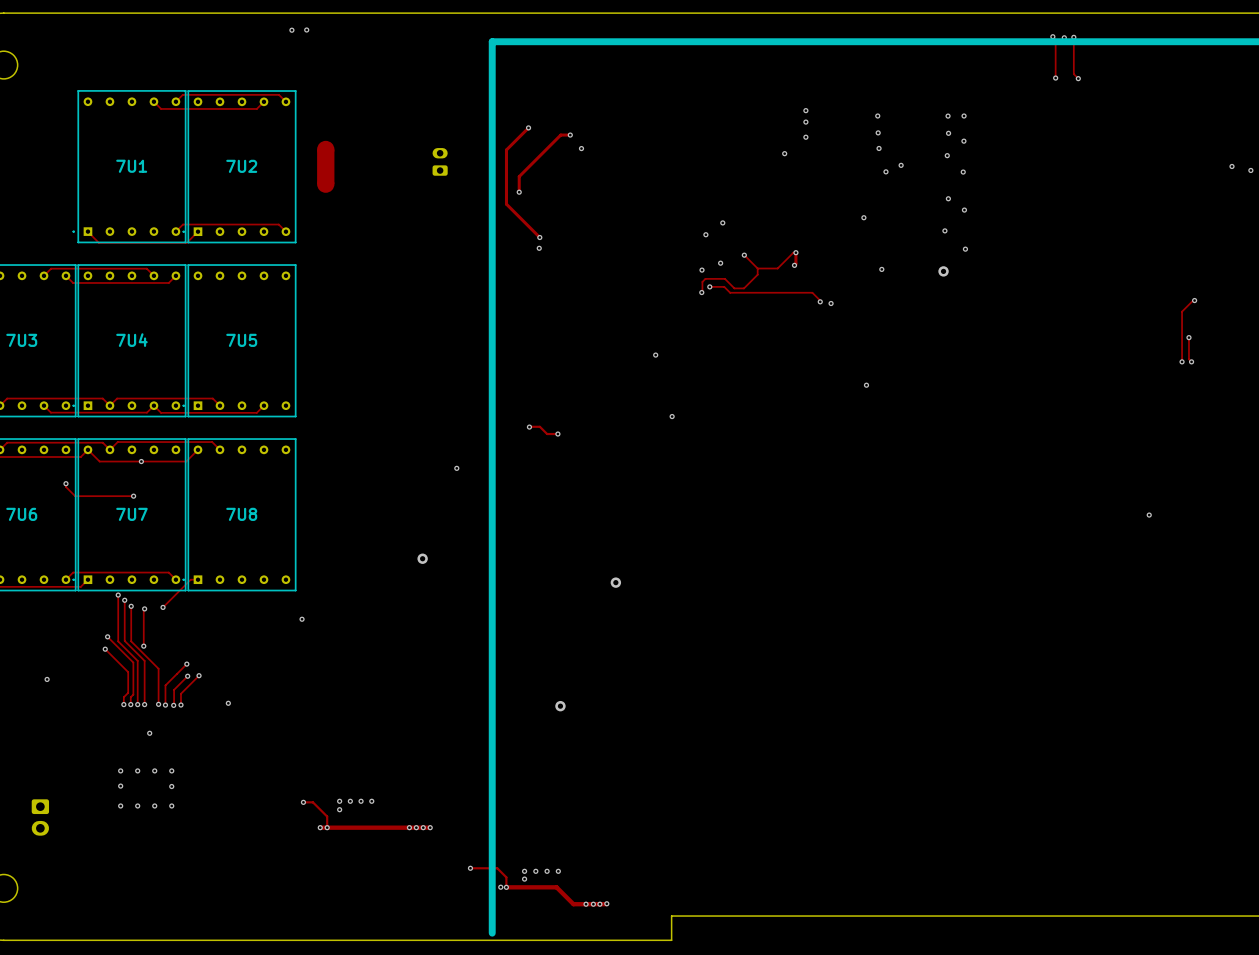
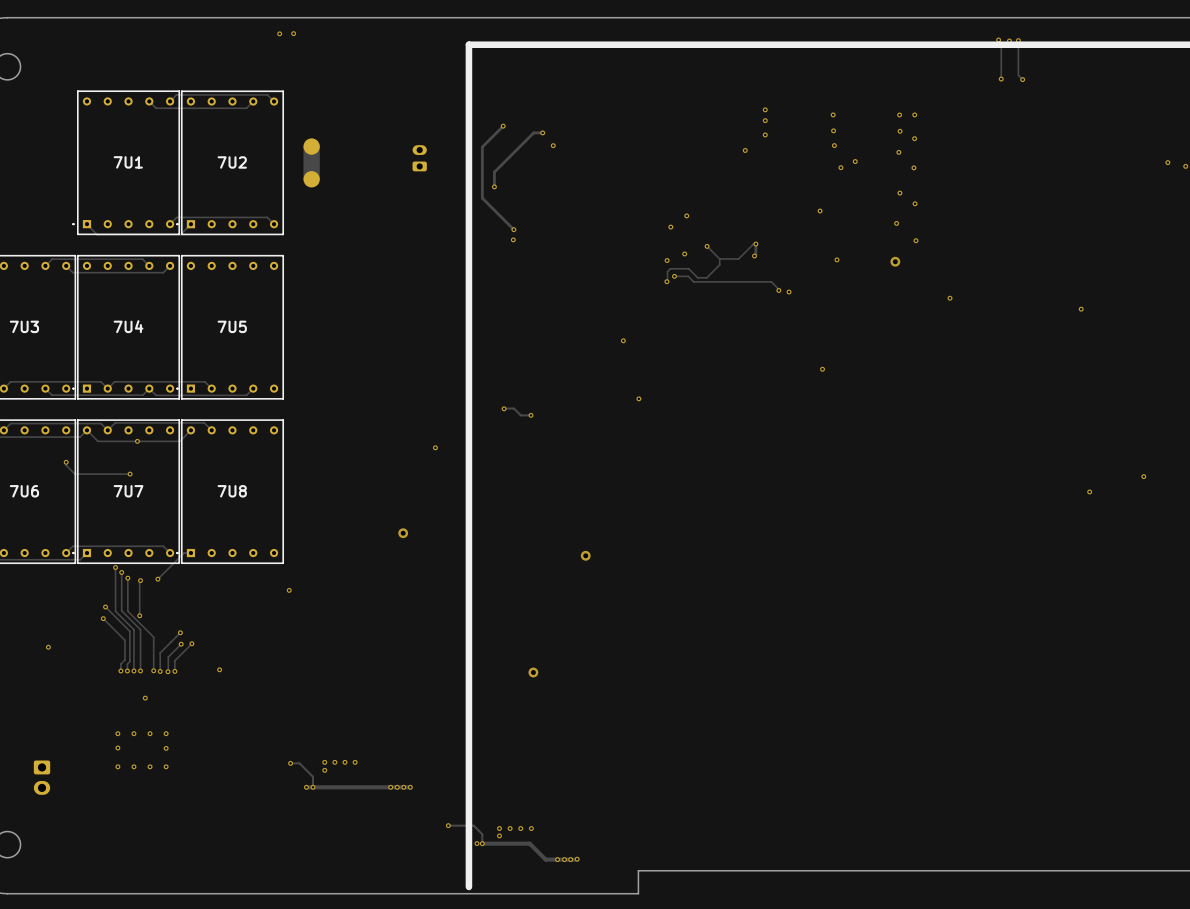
track: (1194, 300) (1182, 311) (1182, 361) -> none
via: (1194, 300) -> none
via: none -> (950, 298)
via: none -> (1081, 309)
track: (1188, 337) (1188, 359) (1191, 361) -> none
via: (1188, 337) -> none
via: (1182, 361) -> none
via: (1191, 361) -> none
via: none -> (1143, 476)

